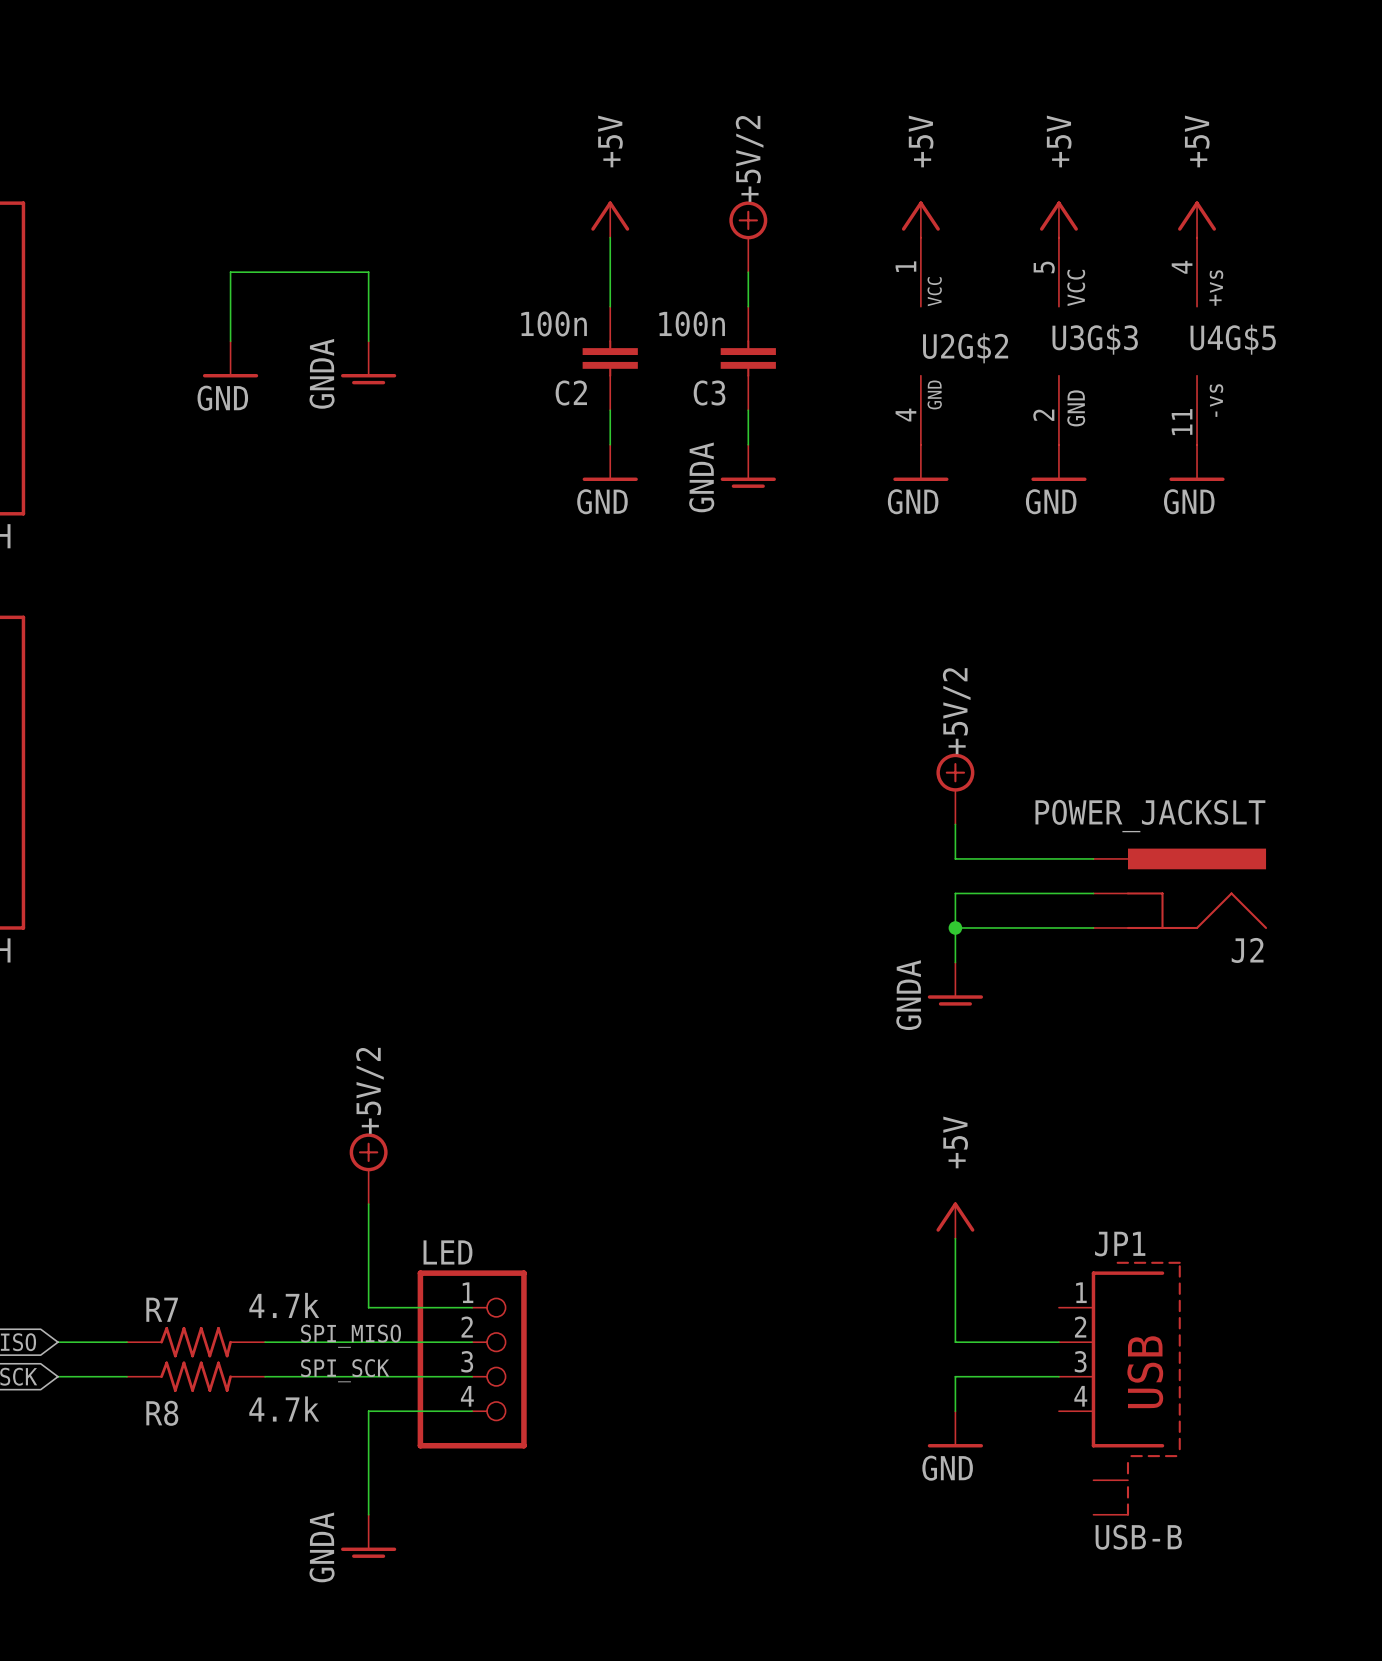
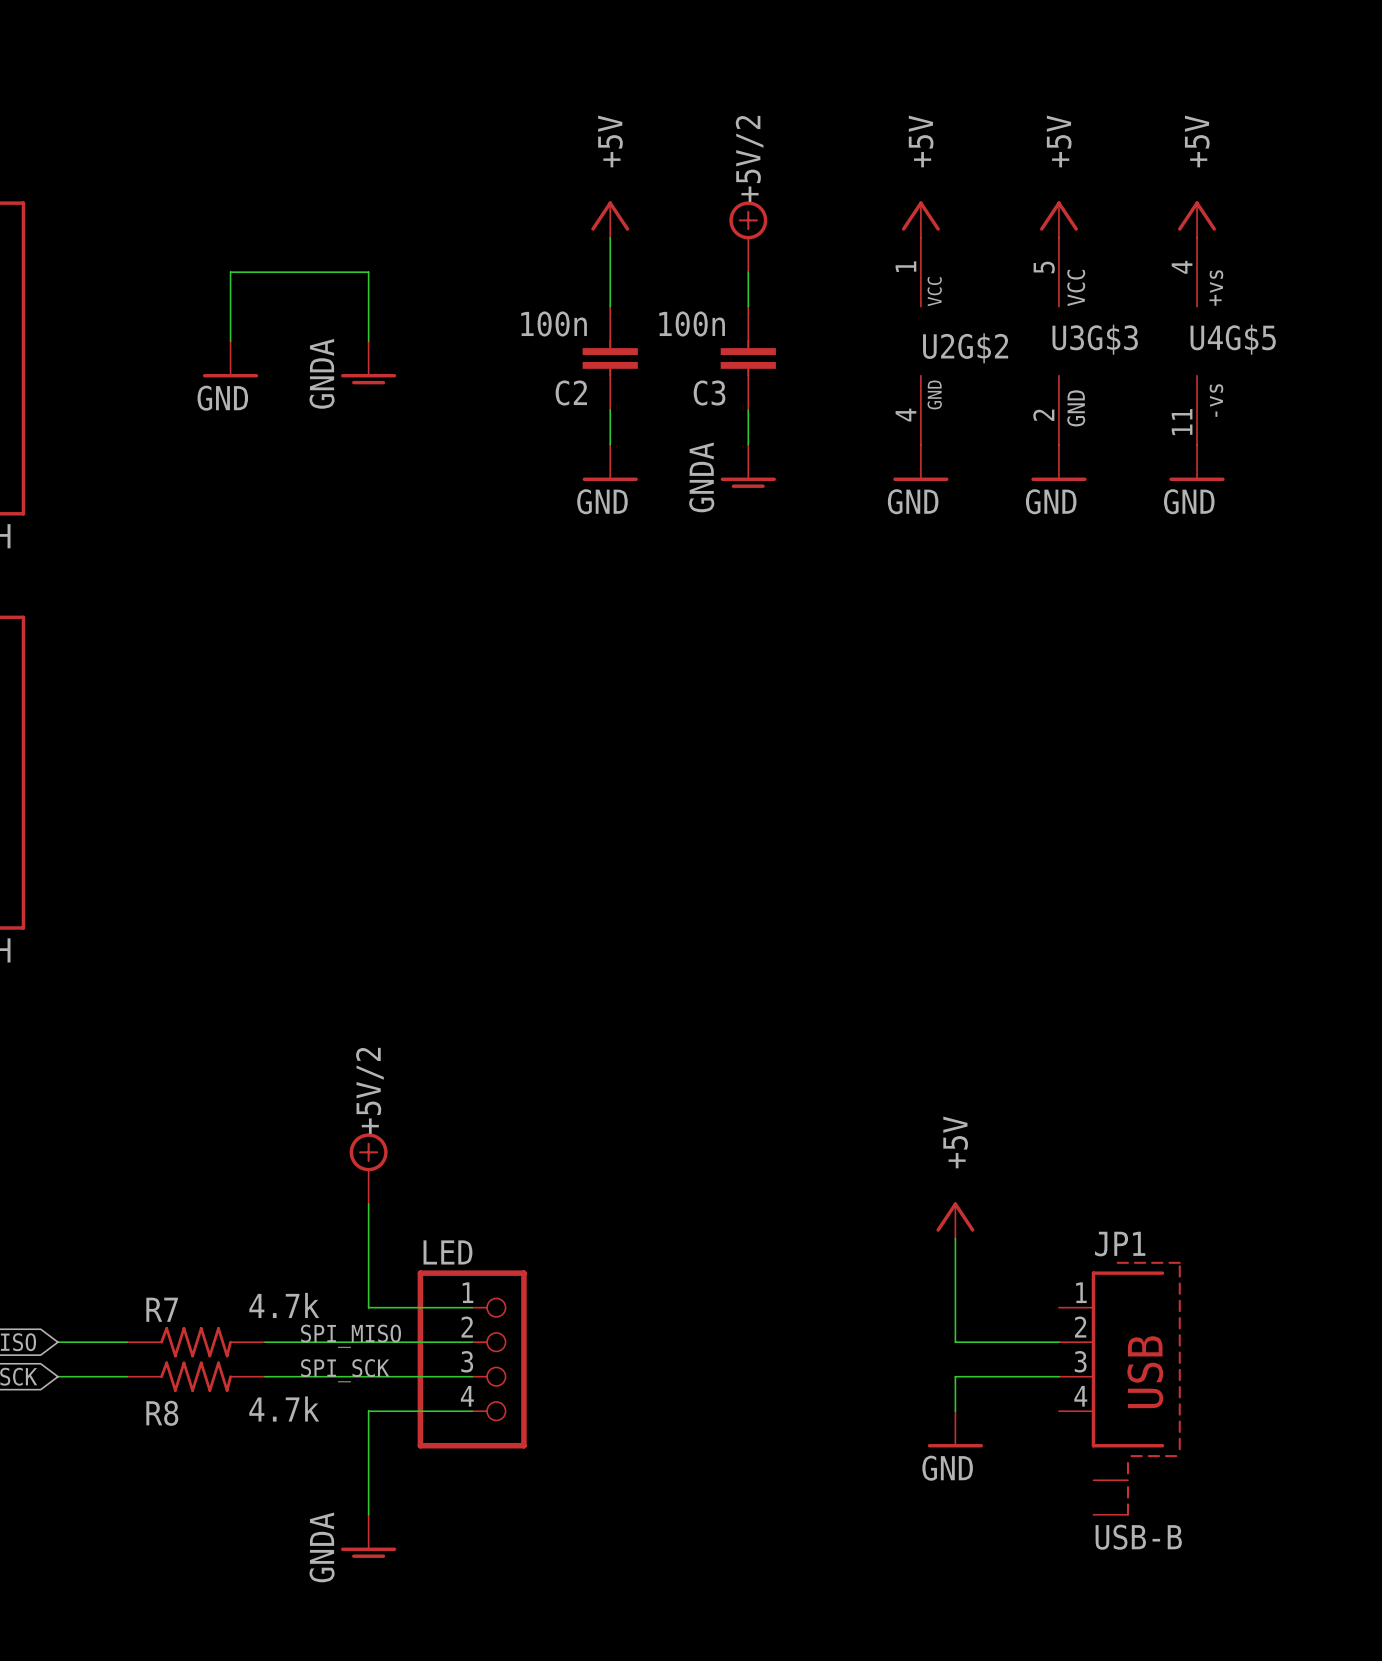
power symbol: +5V/2 (955, 789) -> none
wire: (955, 824) (955, 858) (1093, 858) -> none
J2: POWER_JACKSLT (1180, 888) -> none
wire: (1093, 893) (955, 893) (955, 962) -> none
wire: (955, 927) (1093, 927) -> none
junction: (955, 927) -> none
power symbol: GNDA (955, 984) -> none

